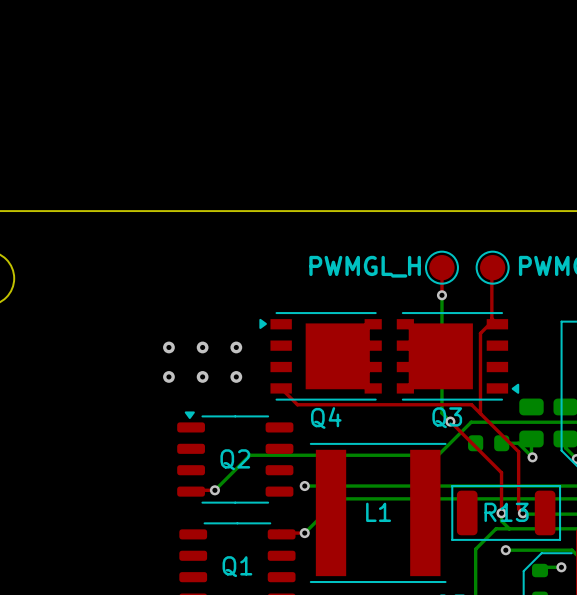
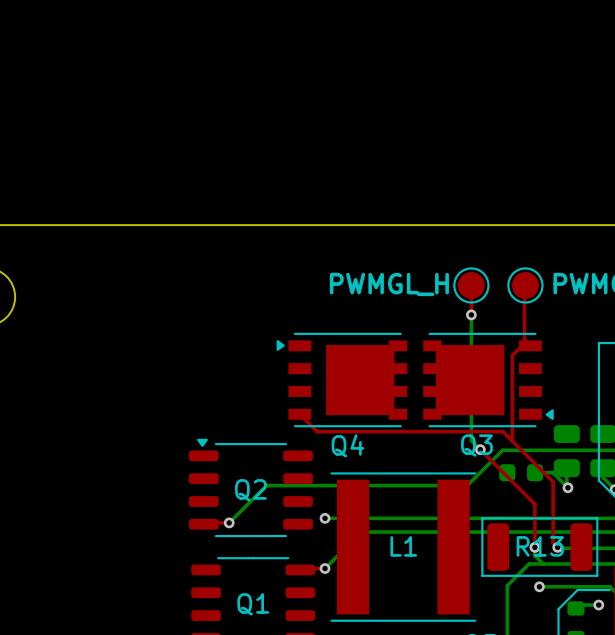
via: (168, 347) -> none
via: (202, 347) -> none
via: (236, 347) -> none
via: (168, 376) -> none
via: (202, 376) -> none
via: (236, 376) -> none

